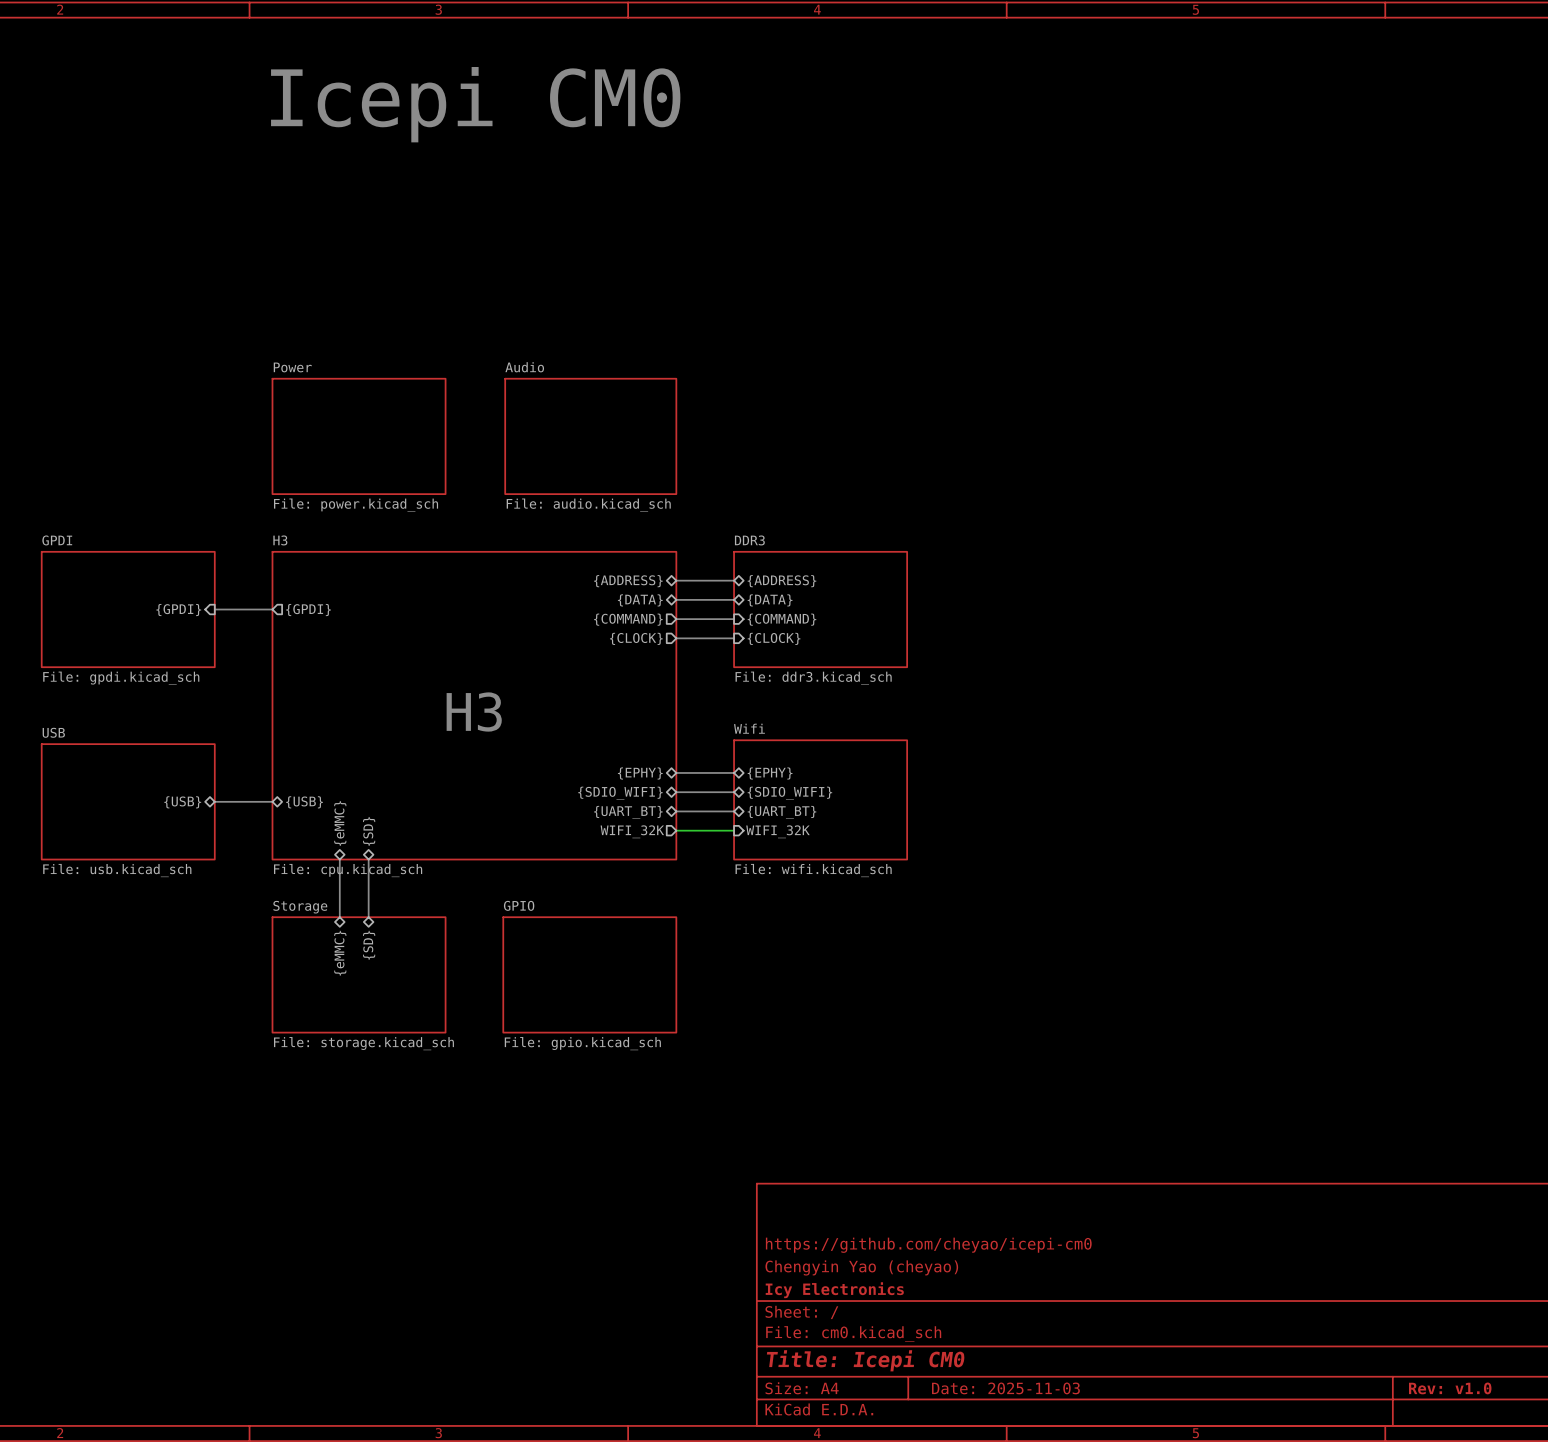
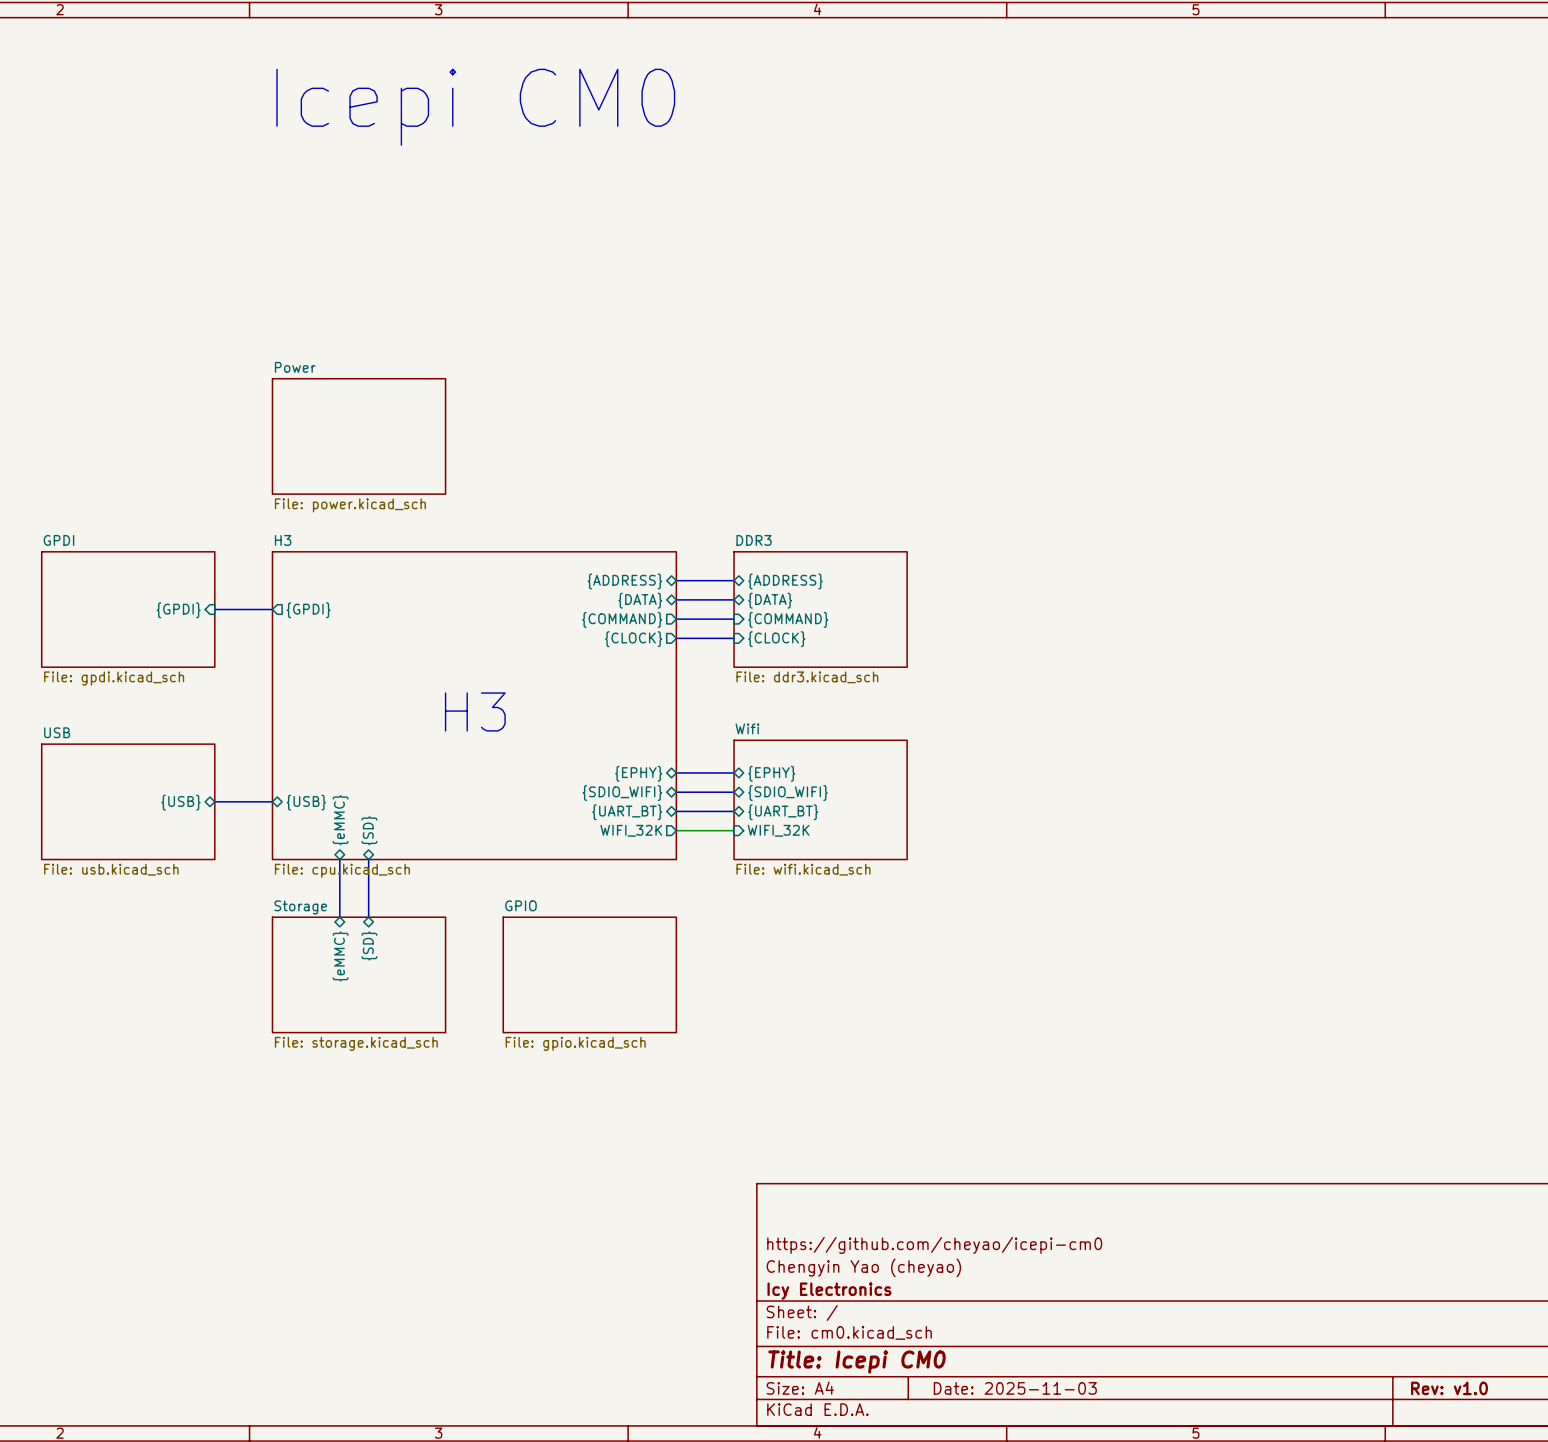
sheet Audio: File: audio.kicad_sch (590, 436) -> none

